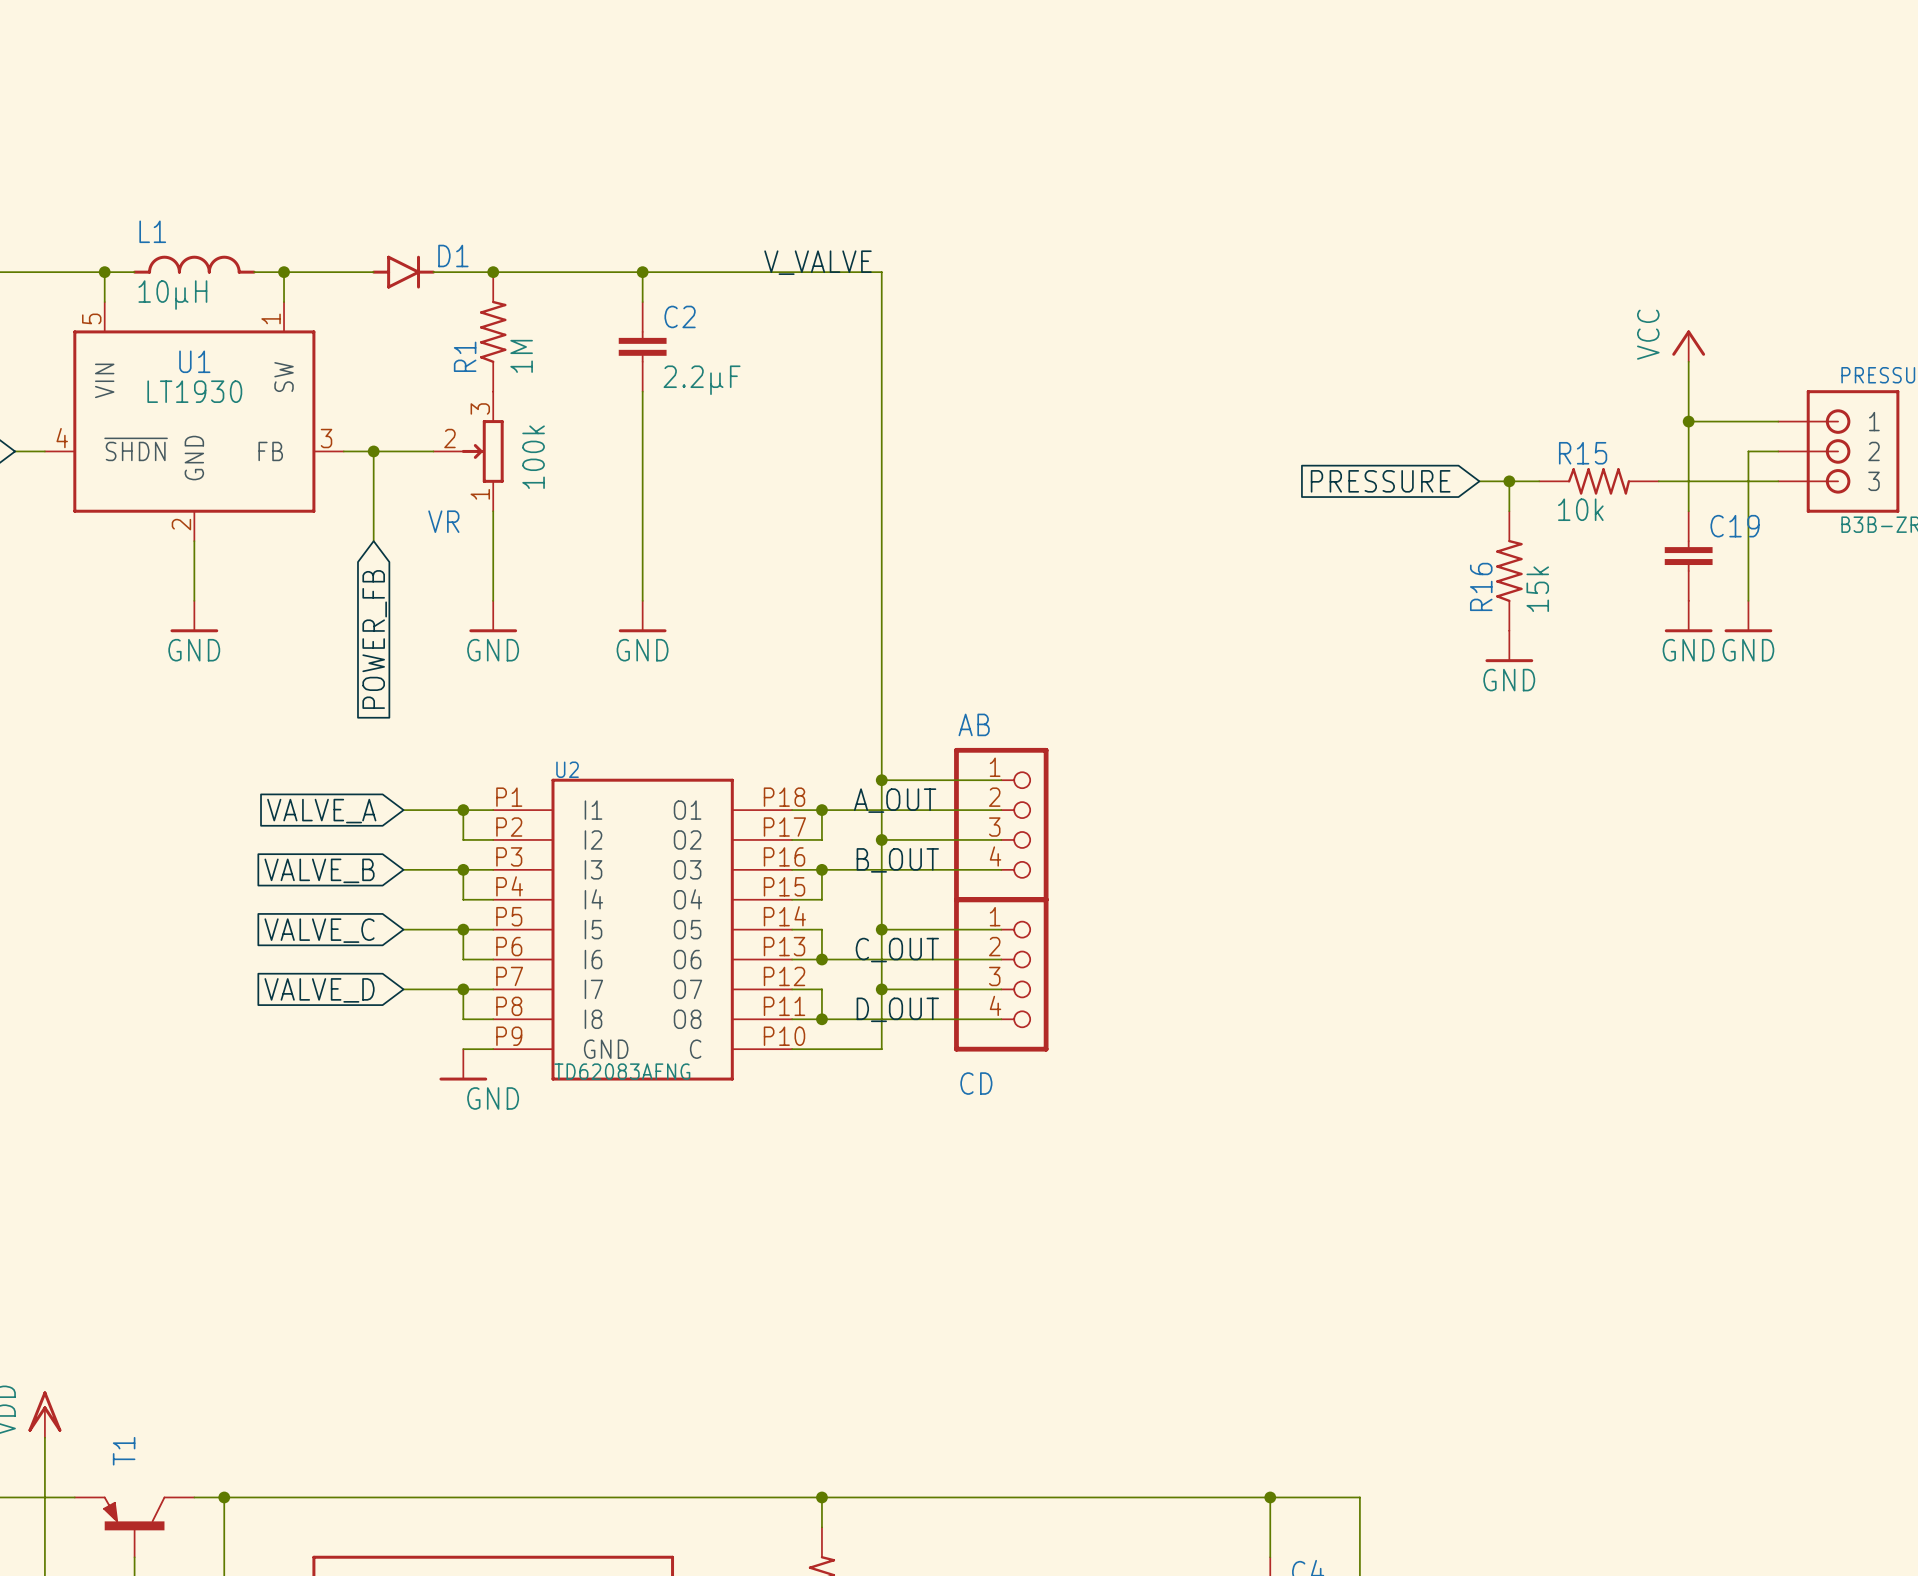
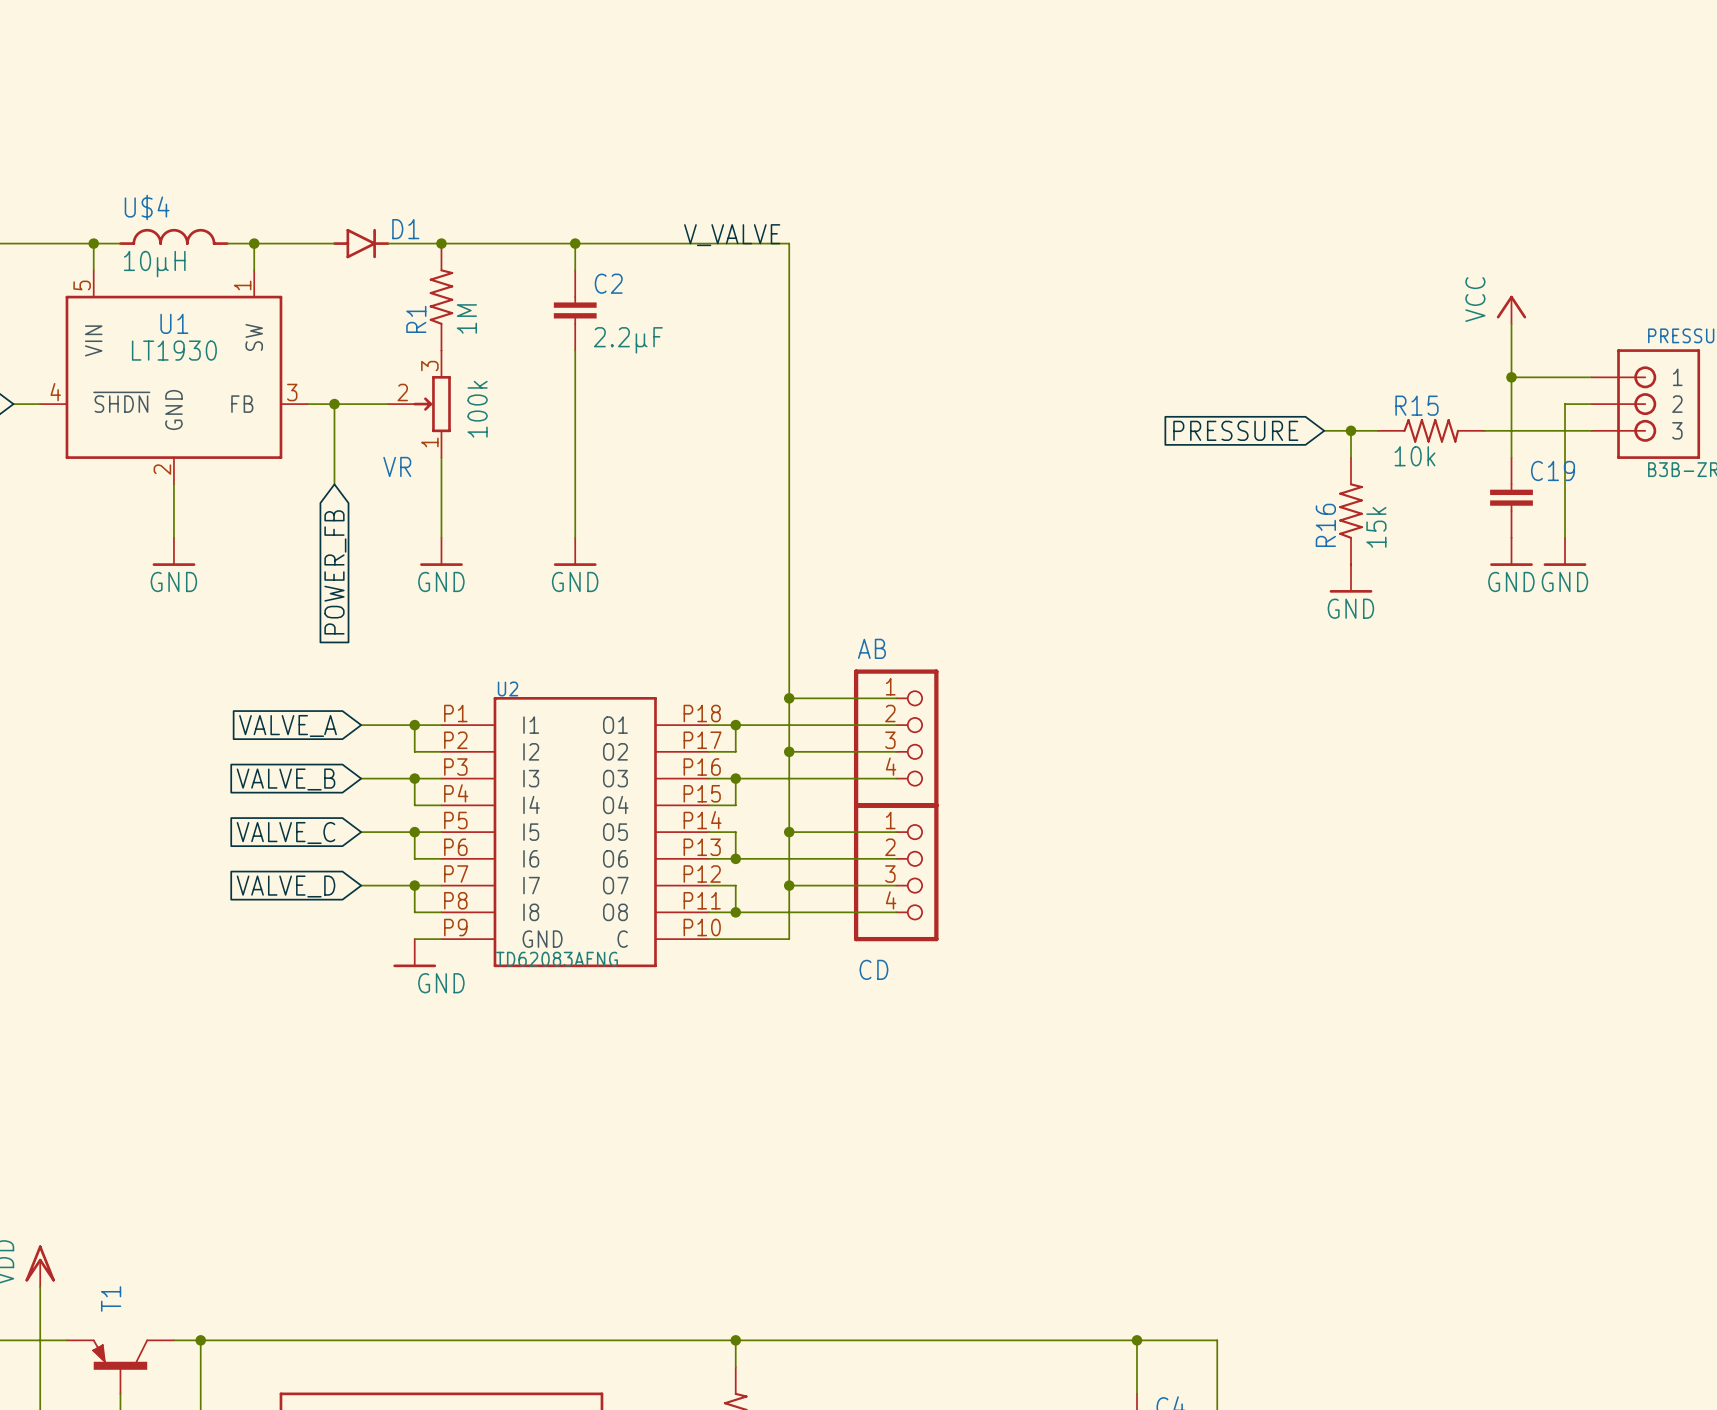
L1 name: L1 (152, 231) -> U$4 (147, 207)
label: A_OUT (895, 800) -> none
label: B_OUT (897, 860) -> none
label: C_OUT (897, 950) -> none
label: D_OUT (897, 1009) -> none

